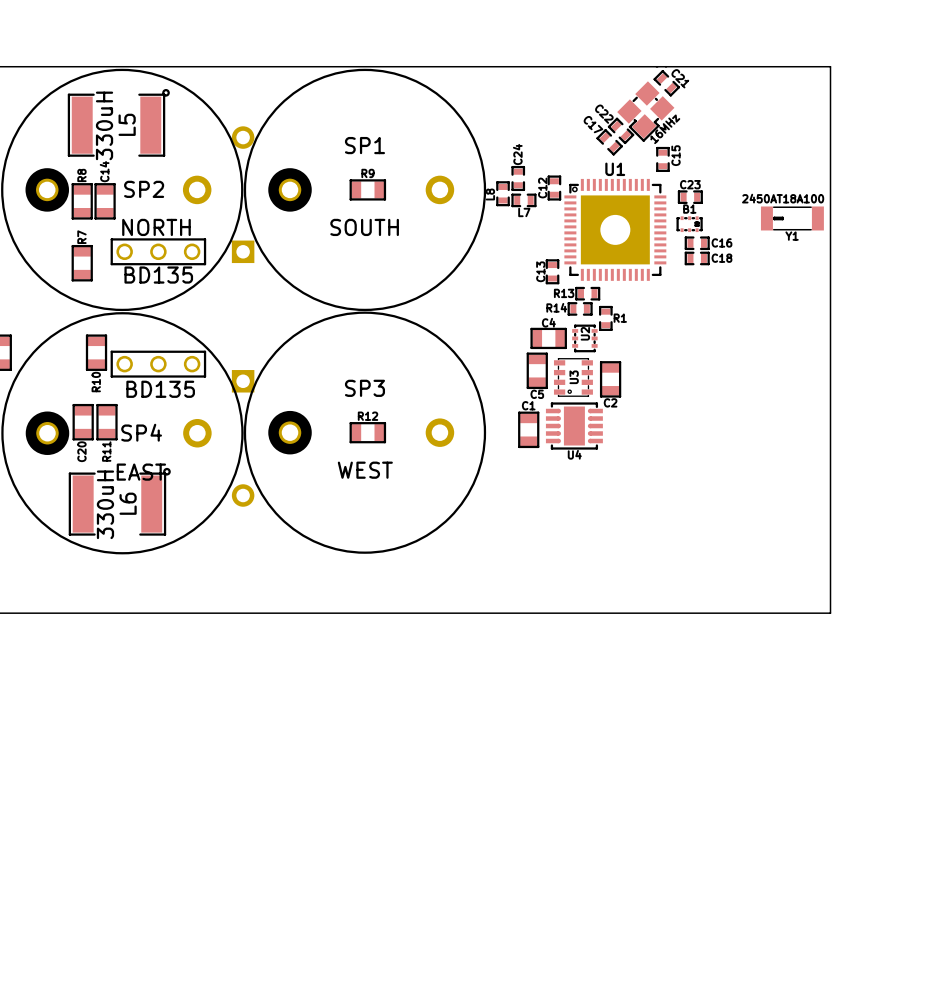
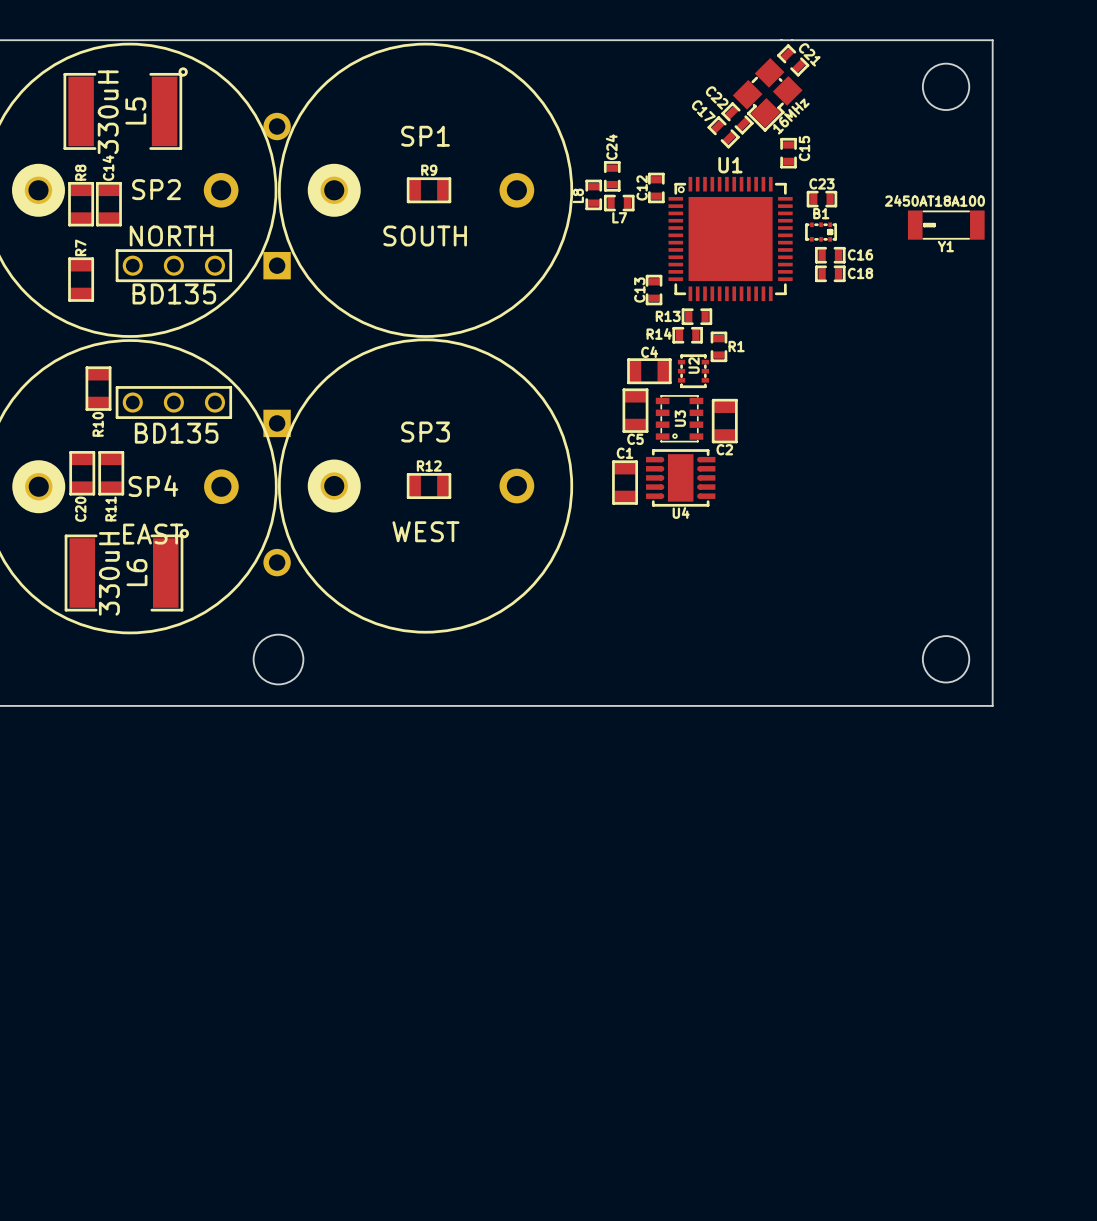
round board edge: none -> [921, 62, 971, 111]
U1 footprint: [564, 178, 667, 281] -> [668, 176, 793, 302]
round board edge: none -> [252, 633, 305, 686]
round board edge: none -> [921, 635, 971, 684]

